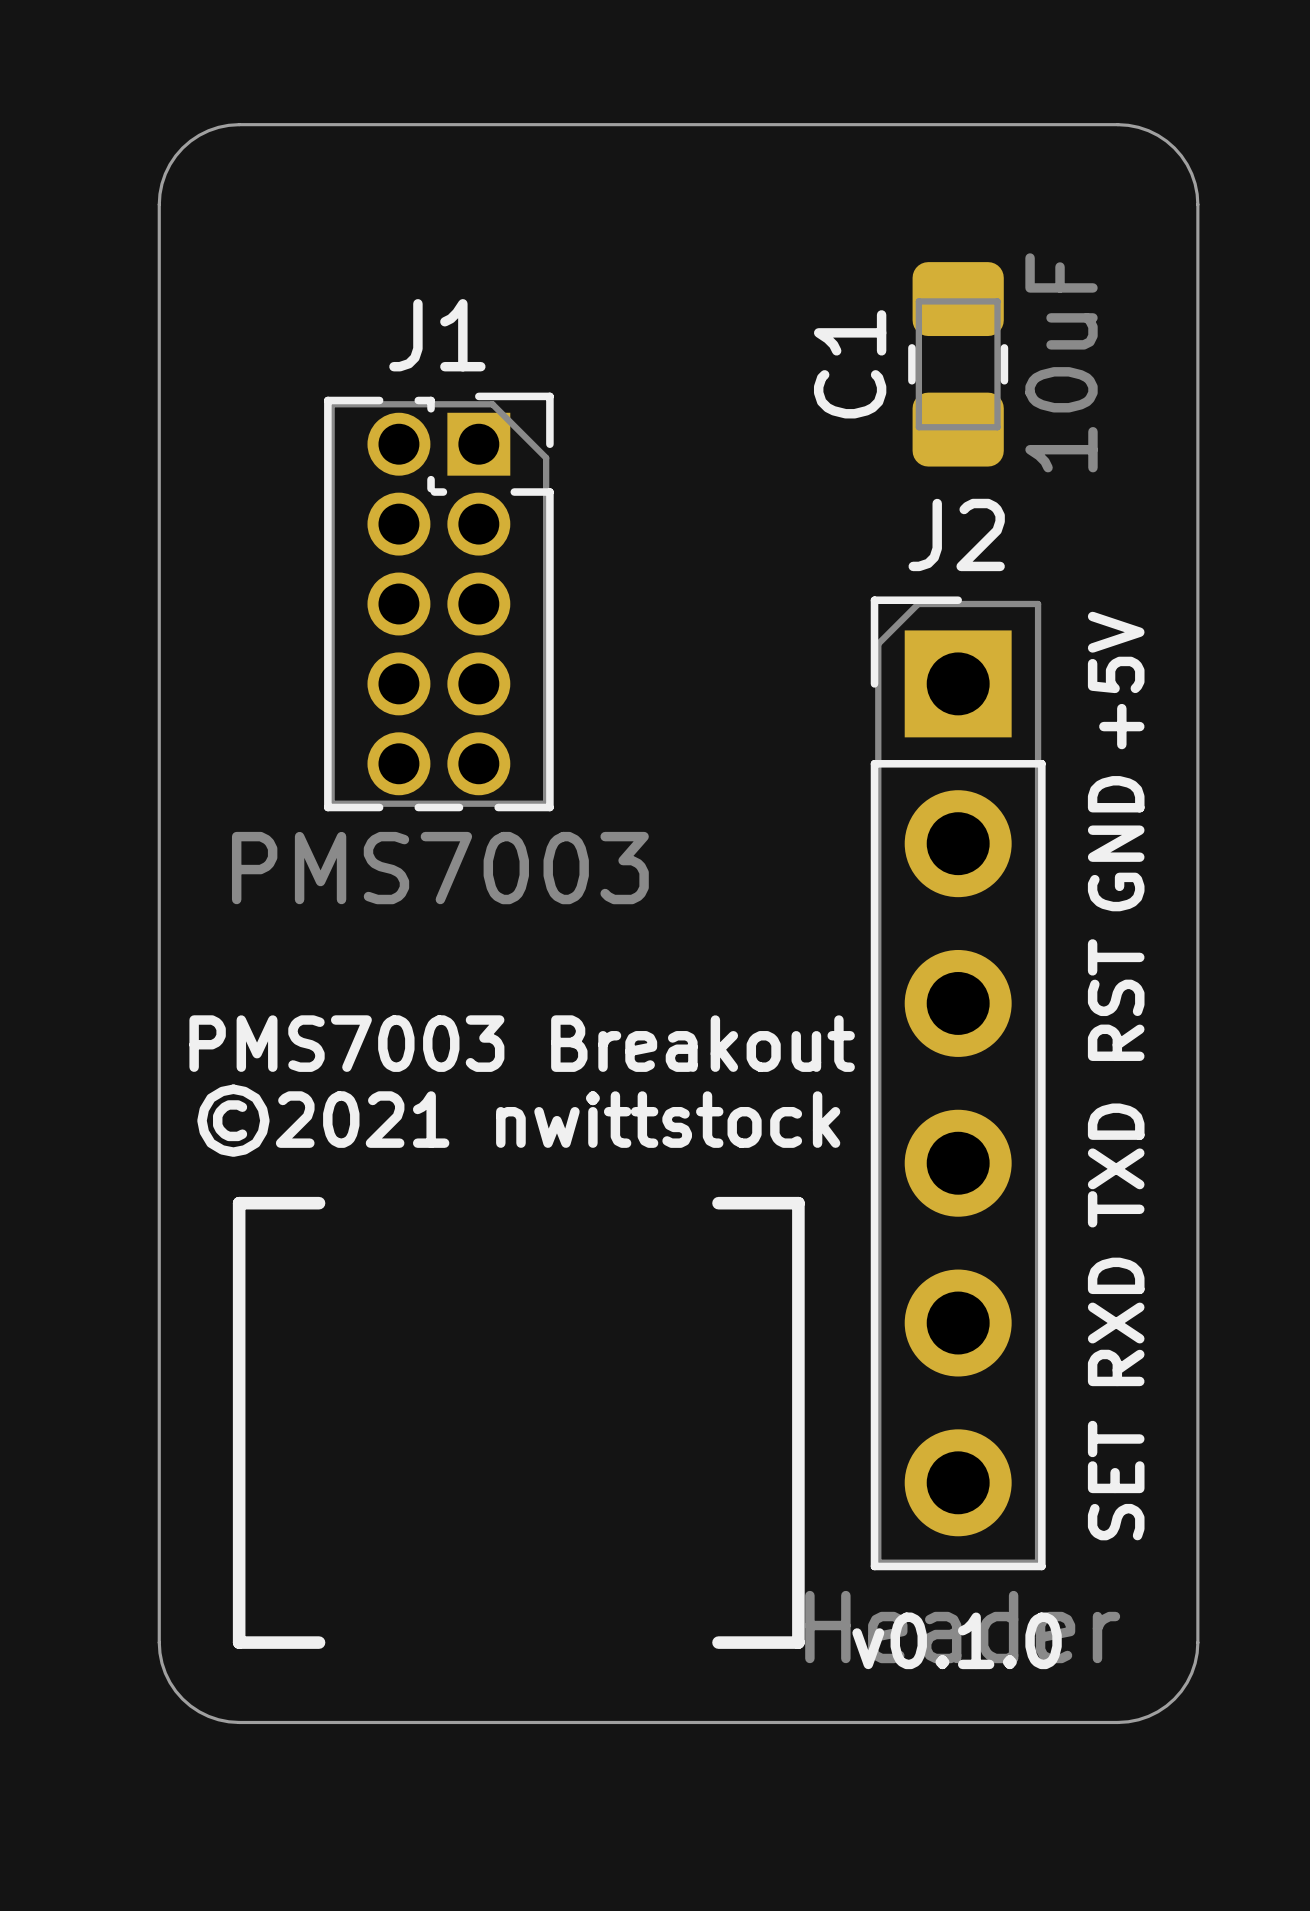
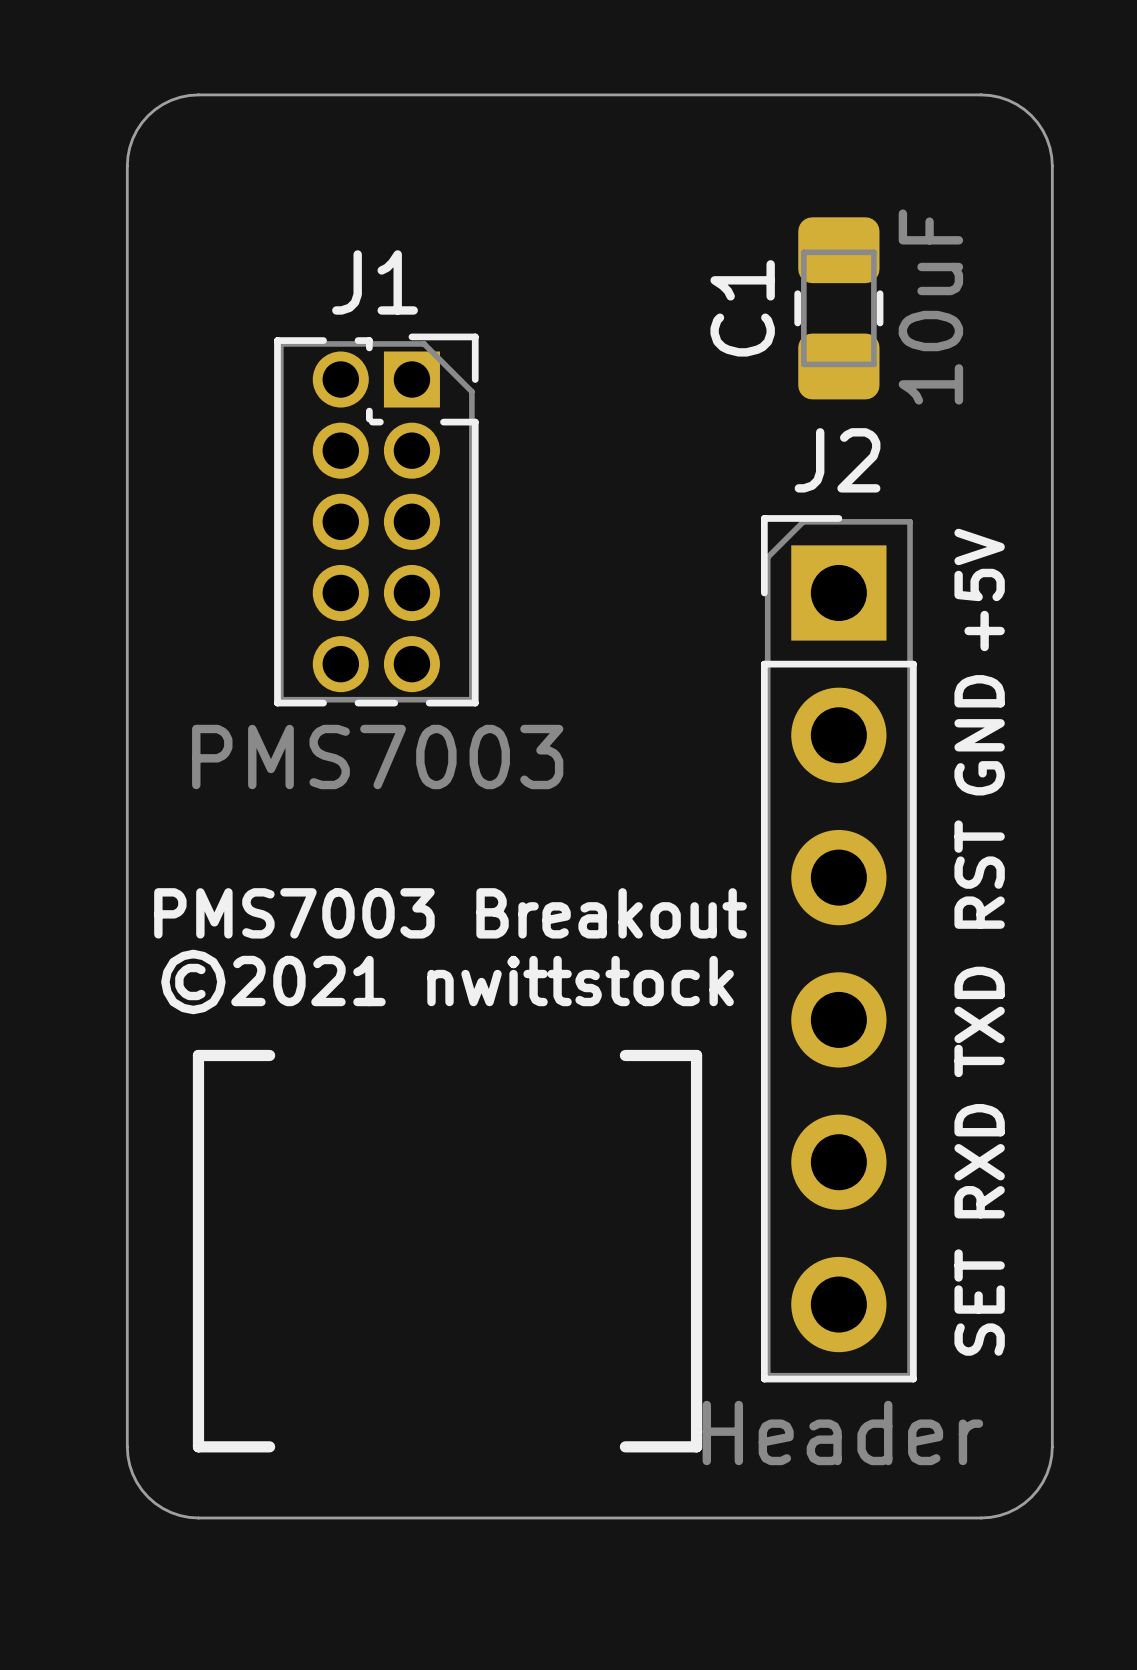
text: v0.1.0 (957, 1640) -> none

